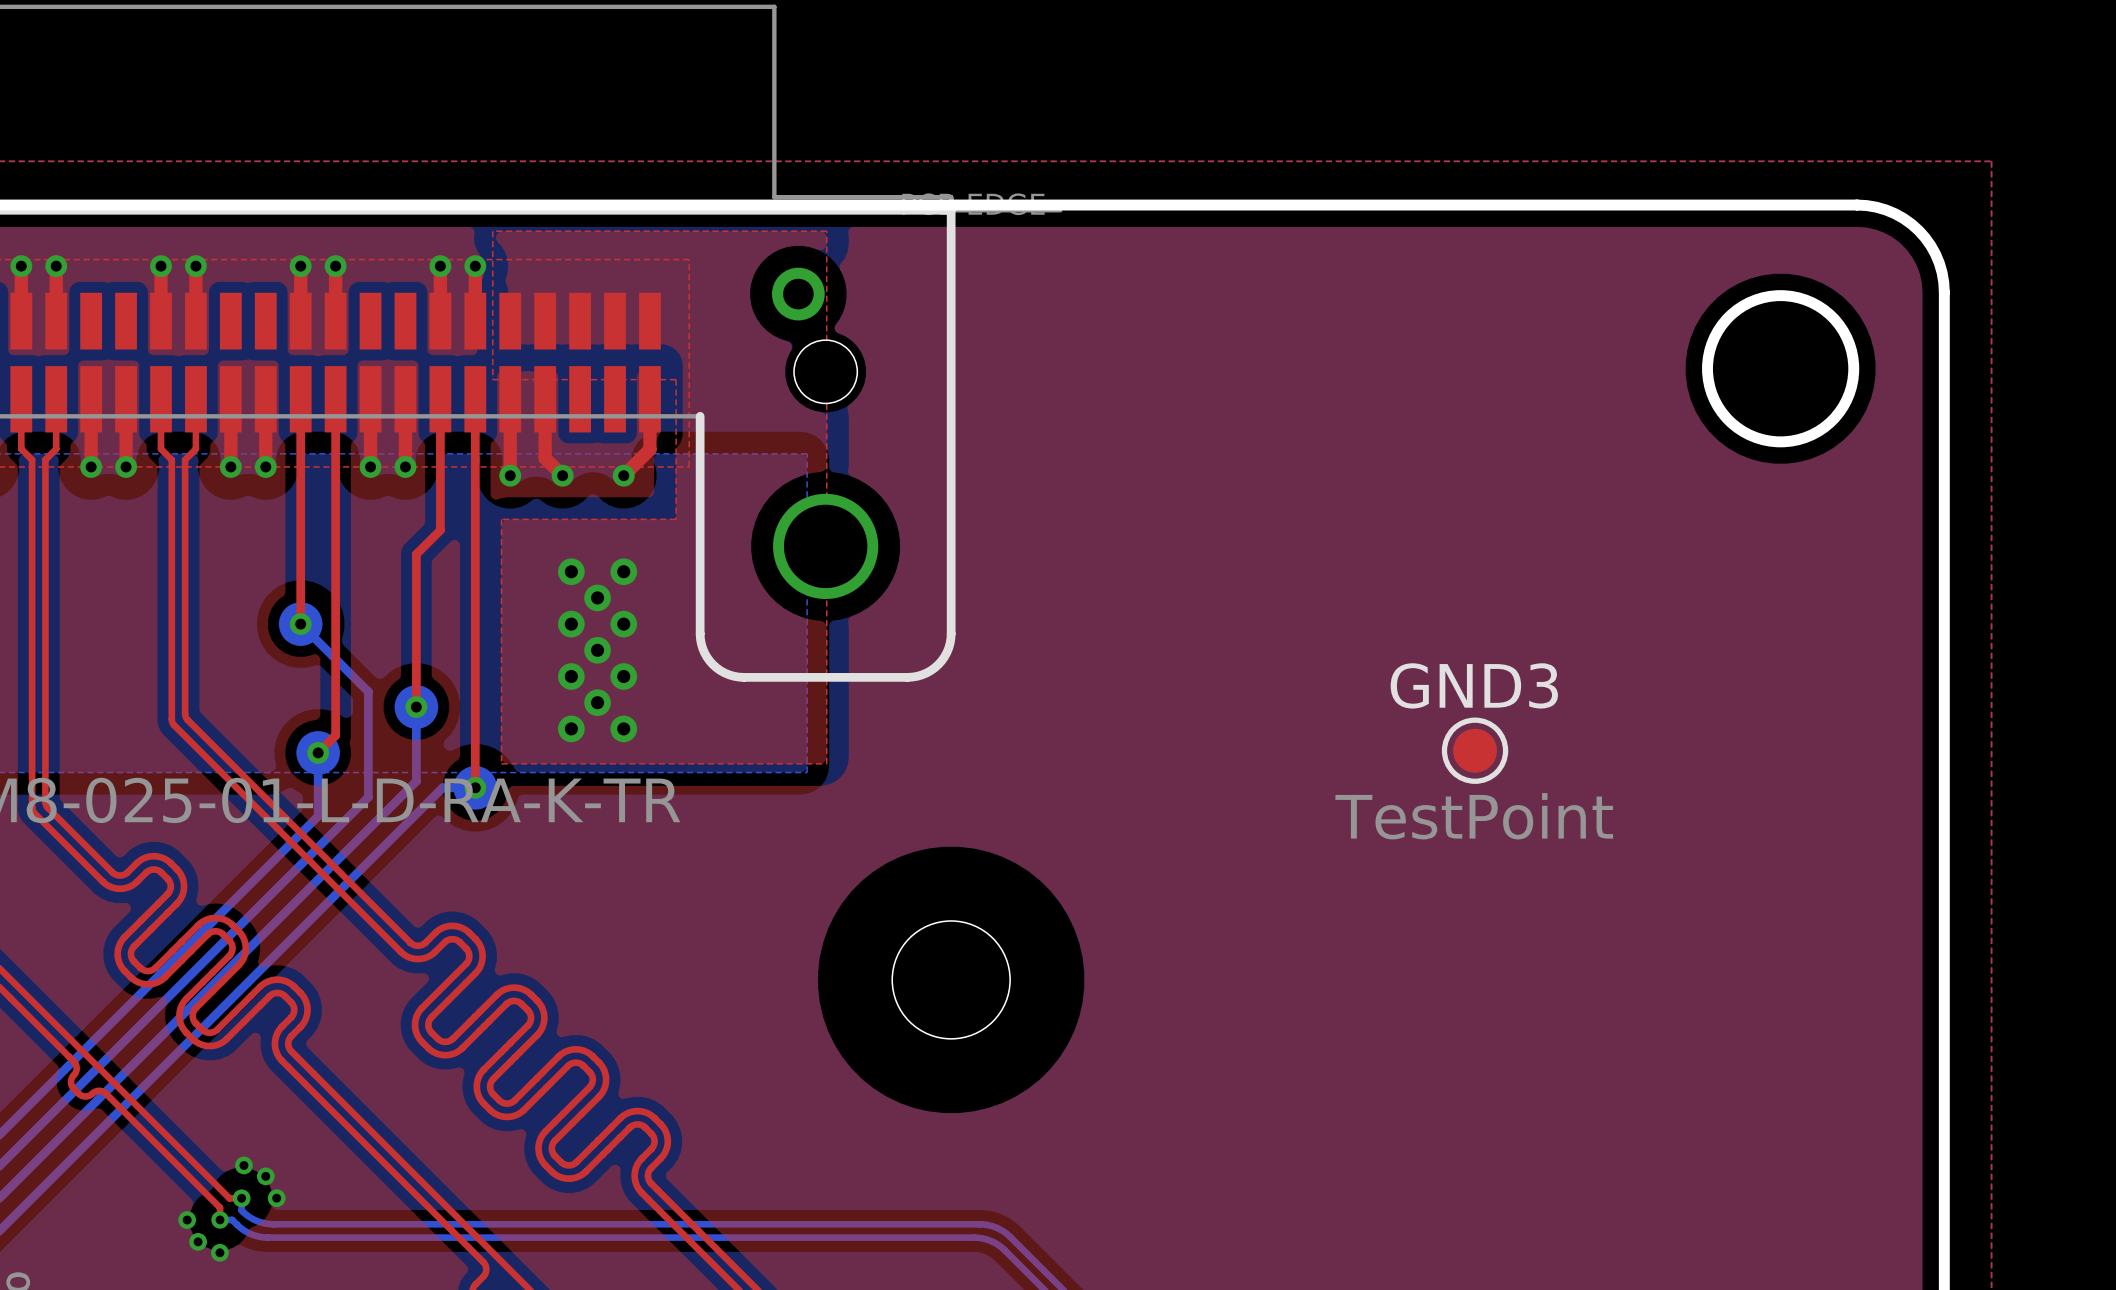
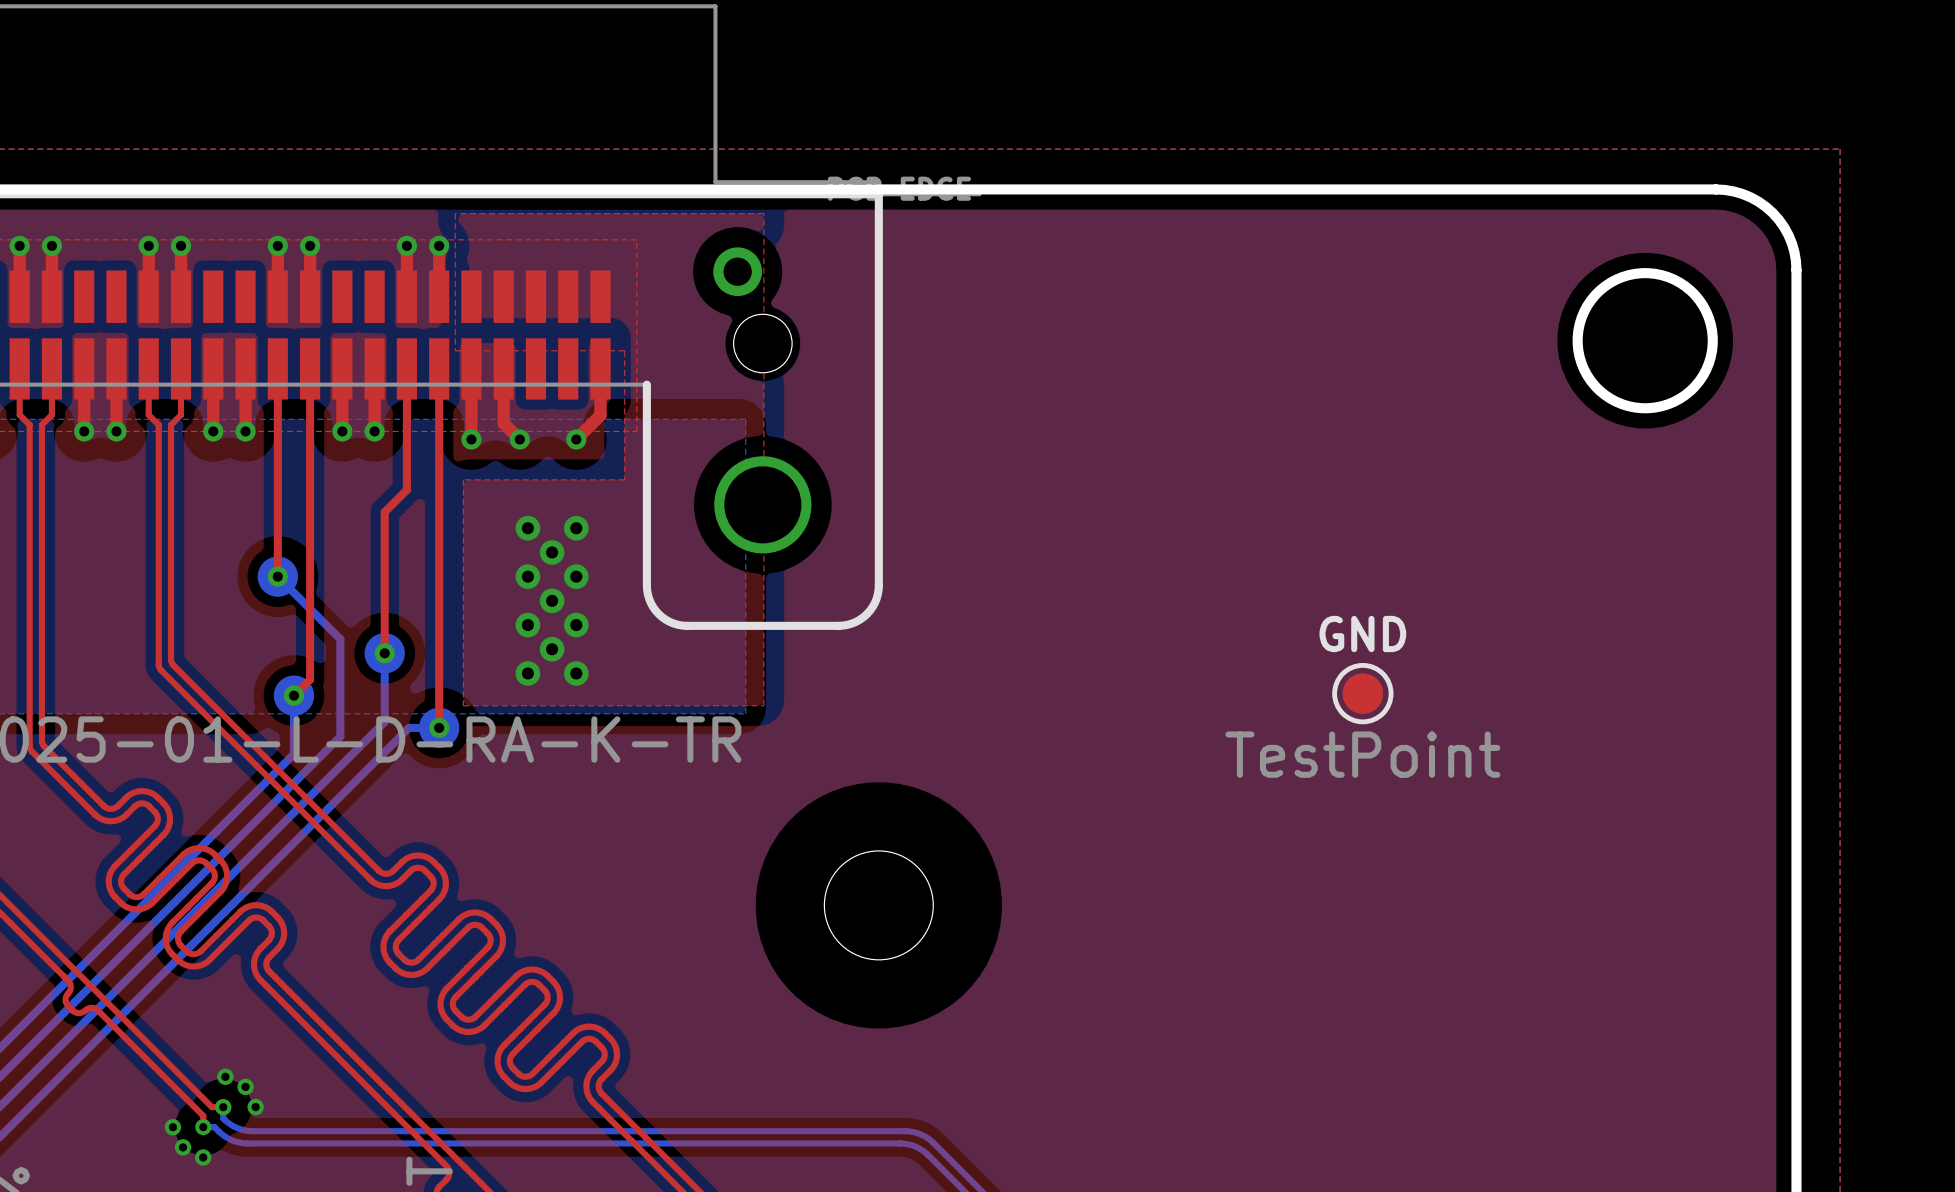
GND3 name: GND3 (1474, 685) -> GND (1362, 634)

